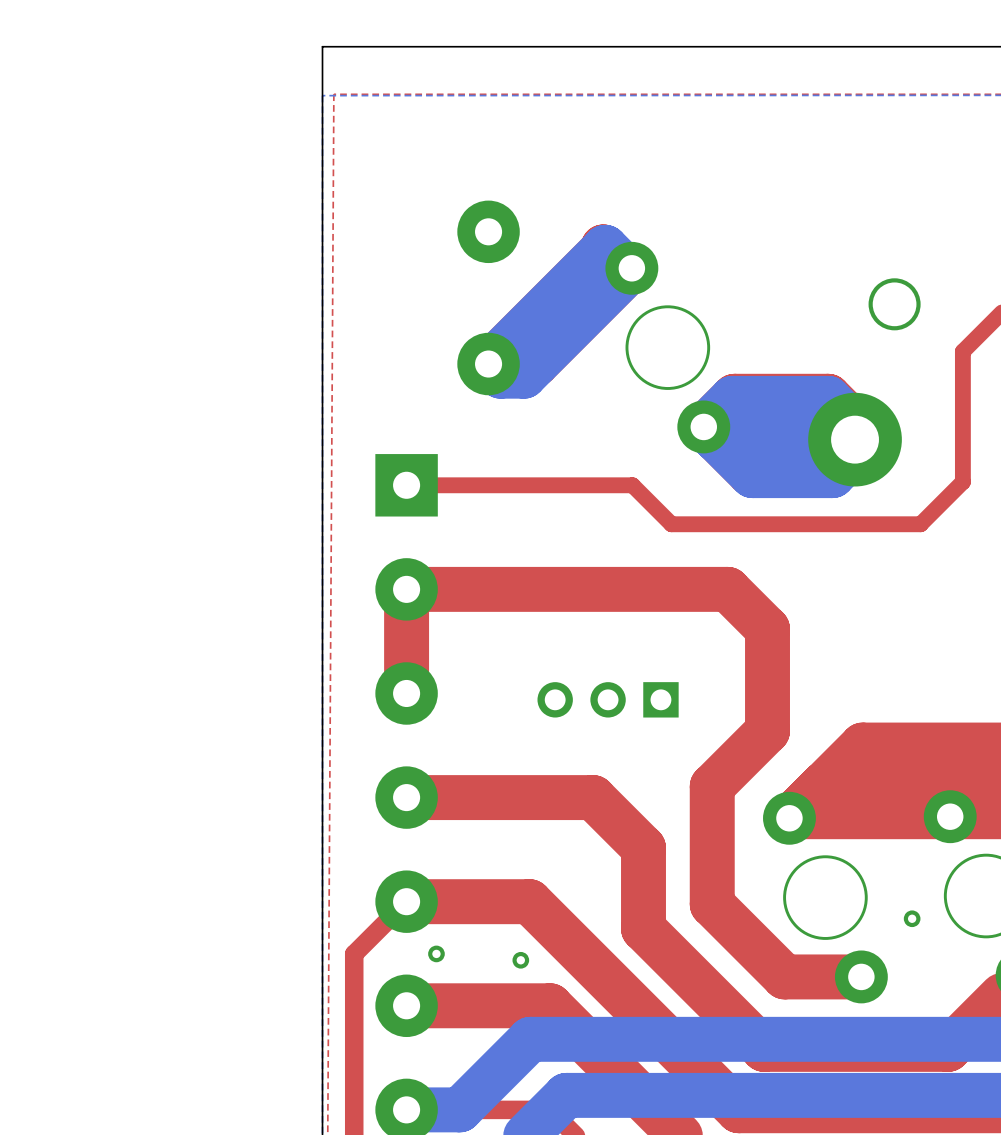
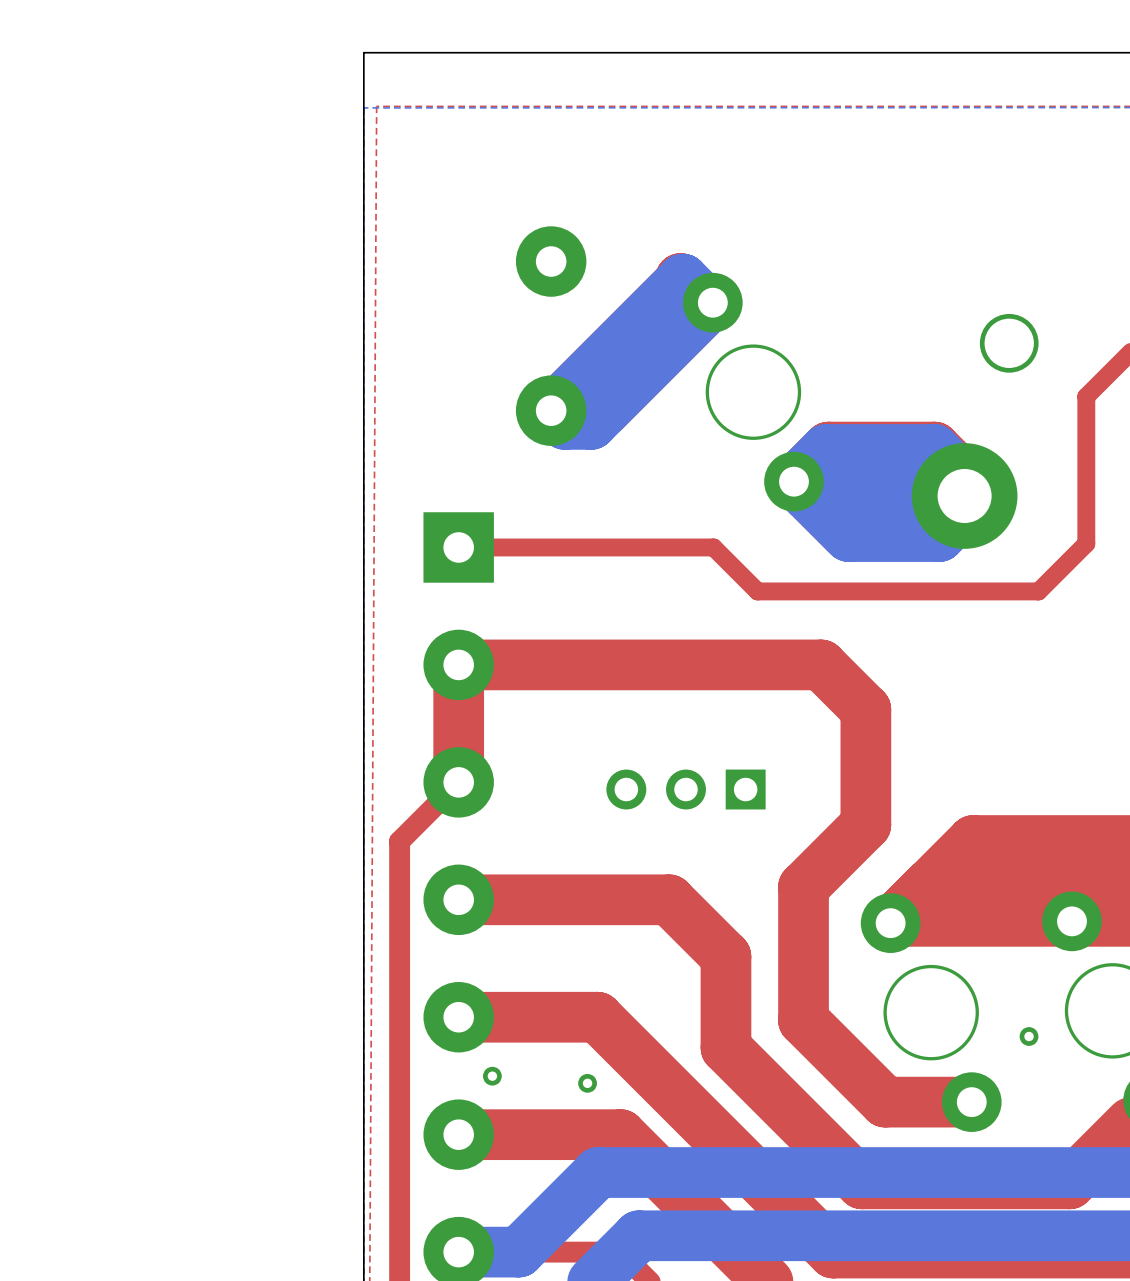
top track: (406, 901) (354, 954) -> (458, 782) (399, 841) (399, 1076)

